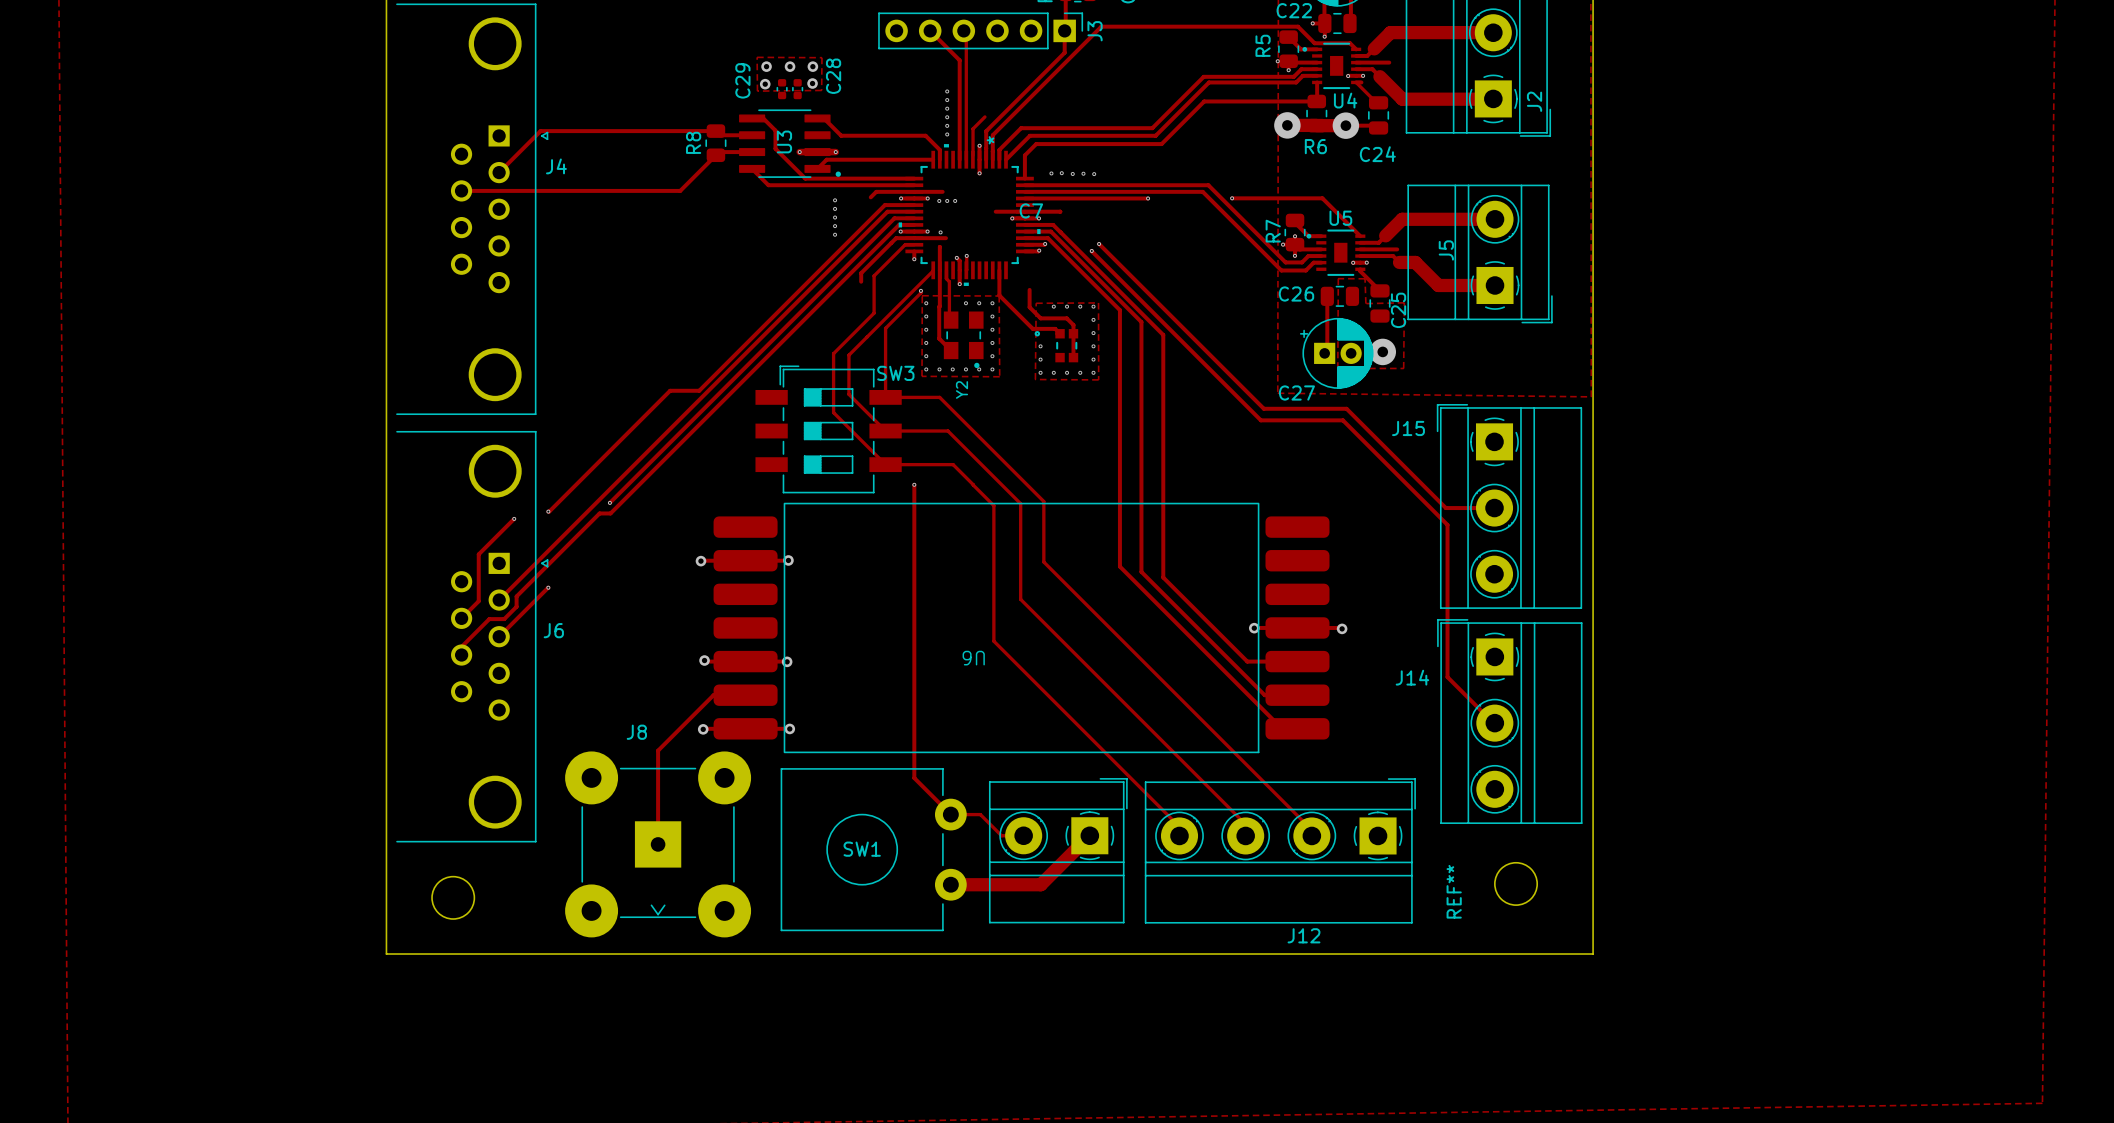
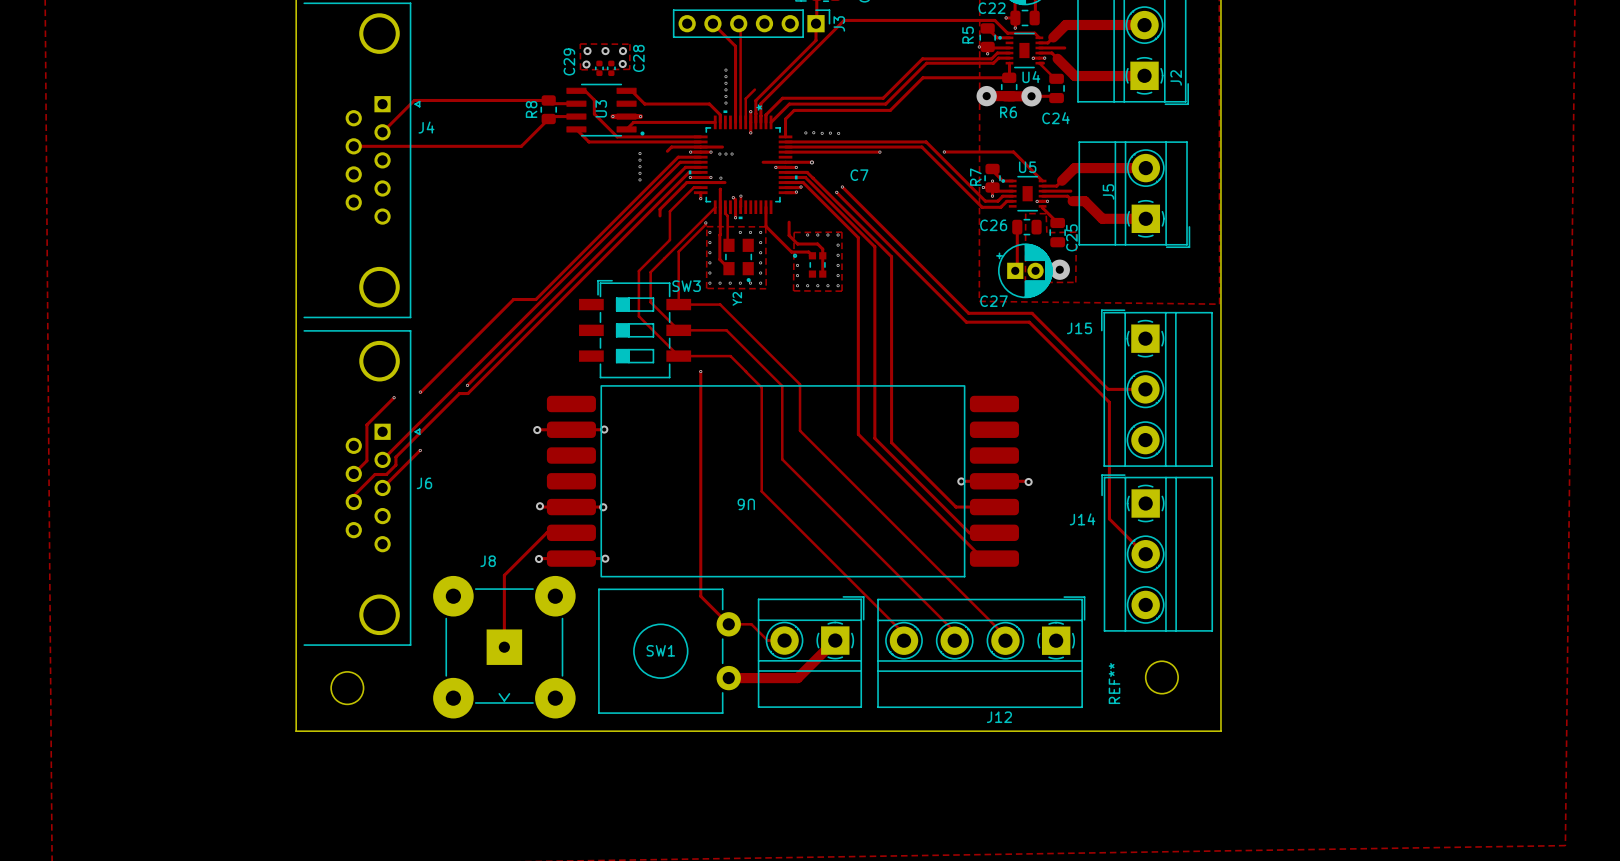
C7 position: (1031, 210) -> (859, 175)
via: none -> (811, 162)

